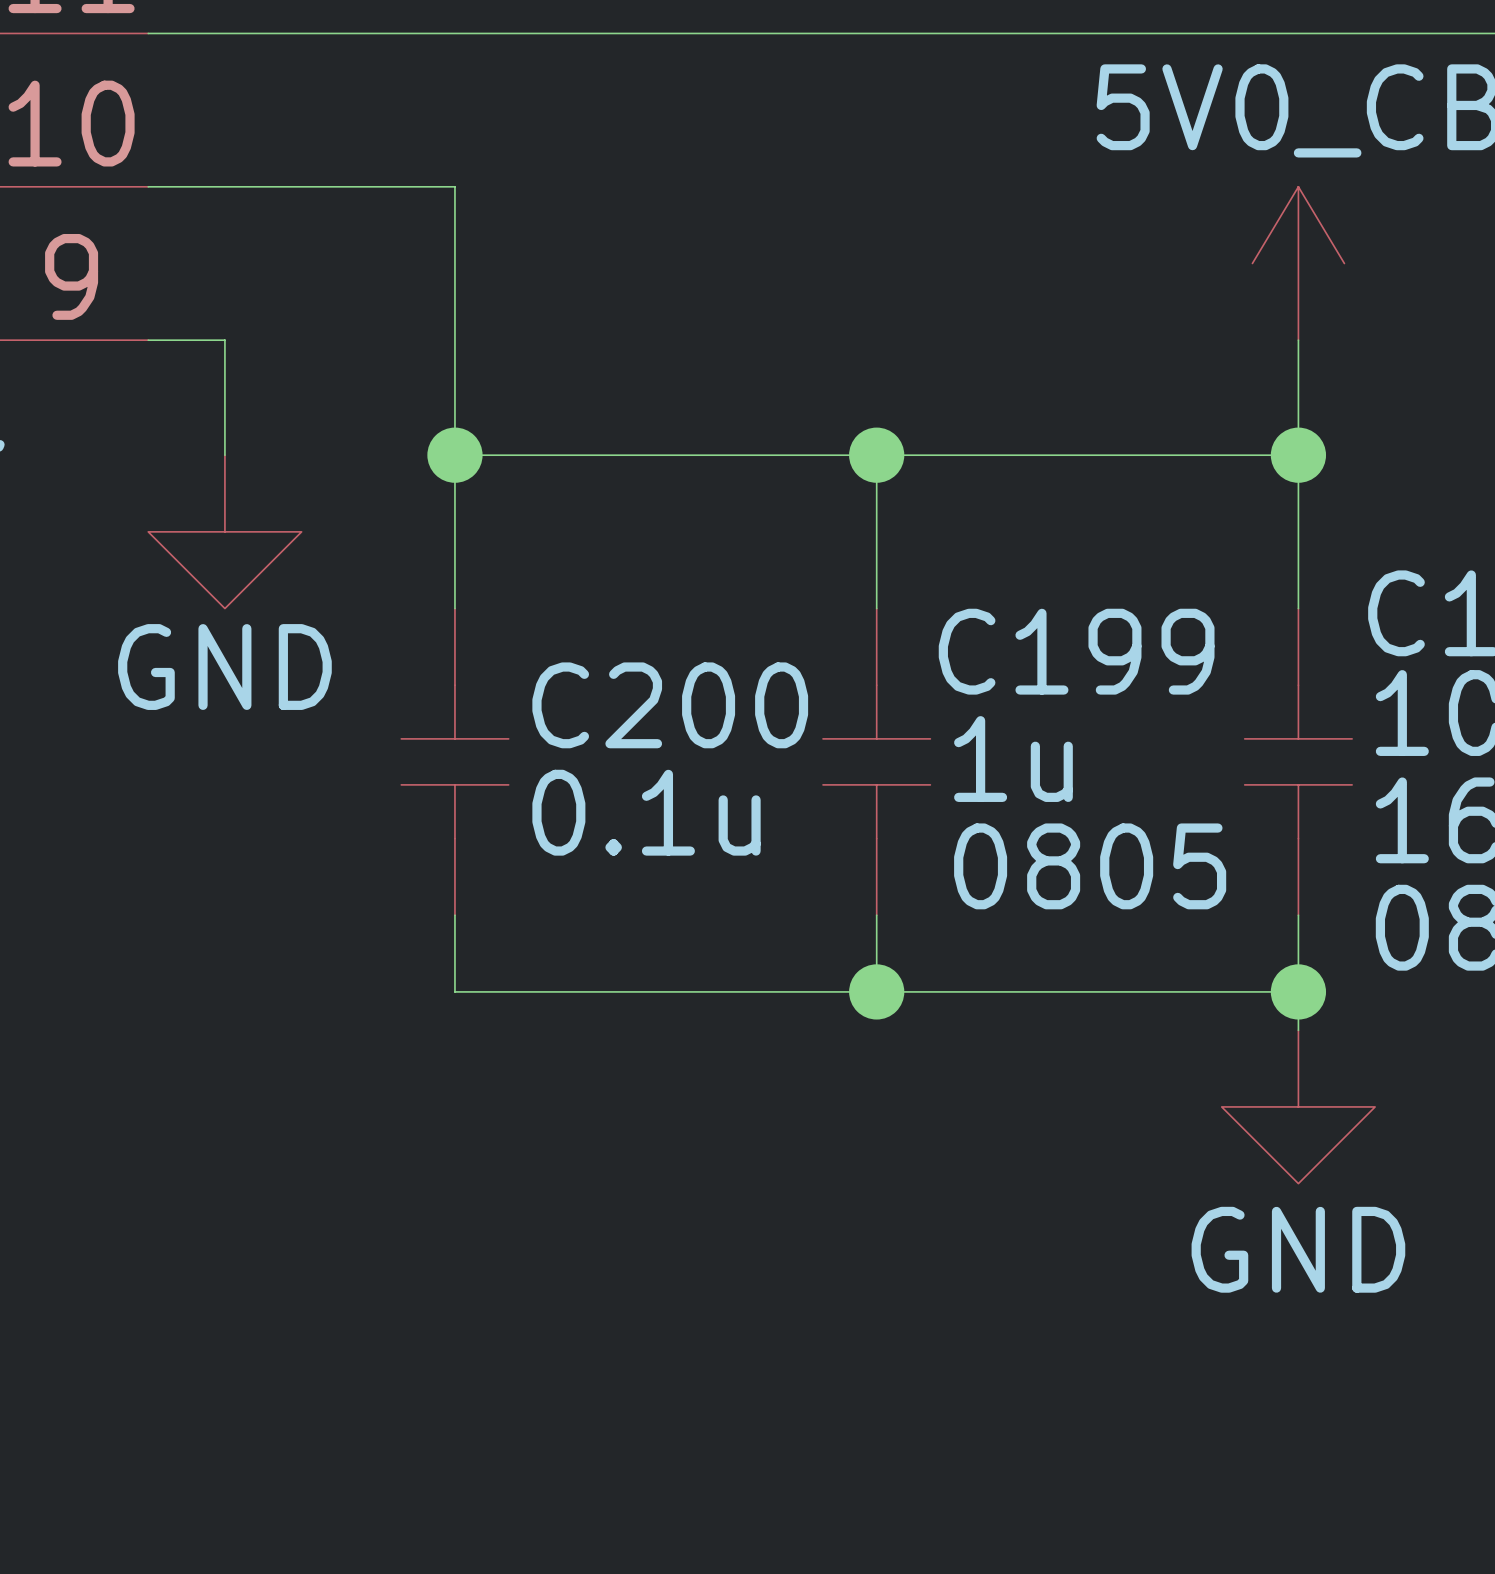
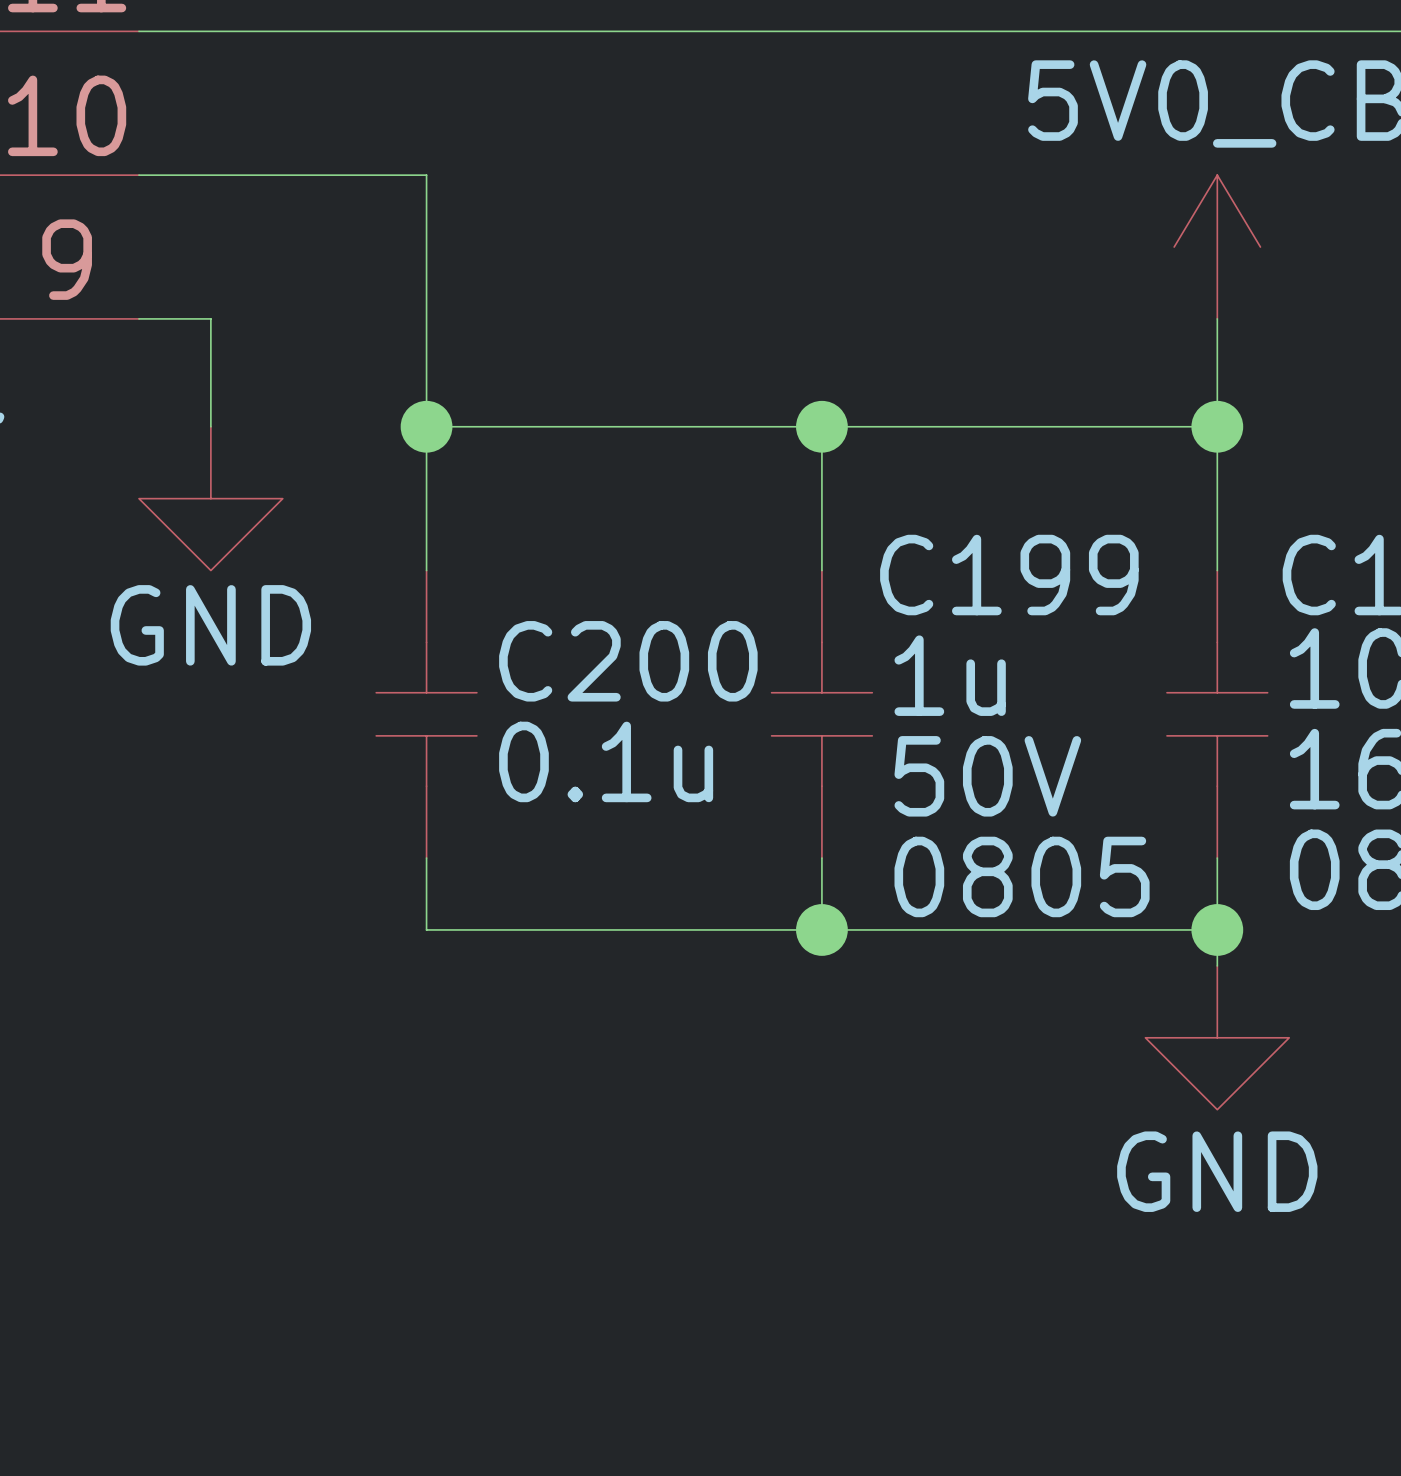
C199 name position: C199 (1076, 651) -> C199 (1009, 575)
C199 value position: 1u (1013, 759) -> 1u (950, 675)
C199 text: none -> 50V (987, 776)
C199 text position: 0805 (1090, 866) -> 0805 (1022, 876)

